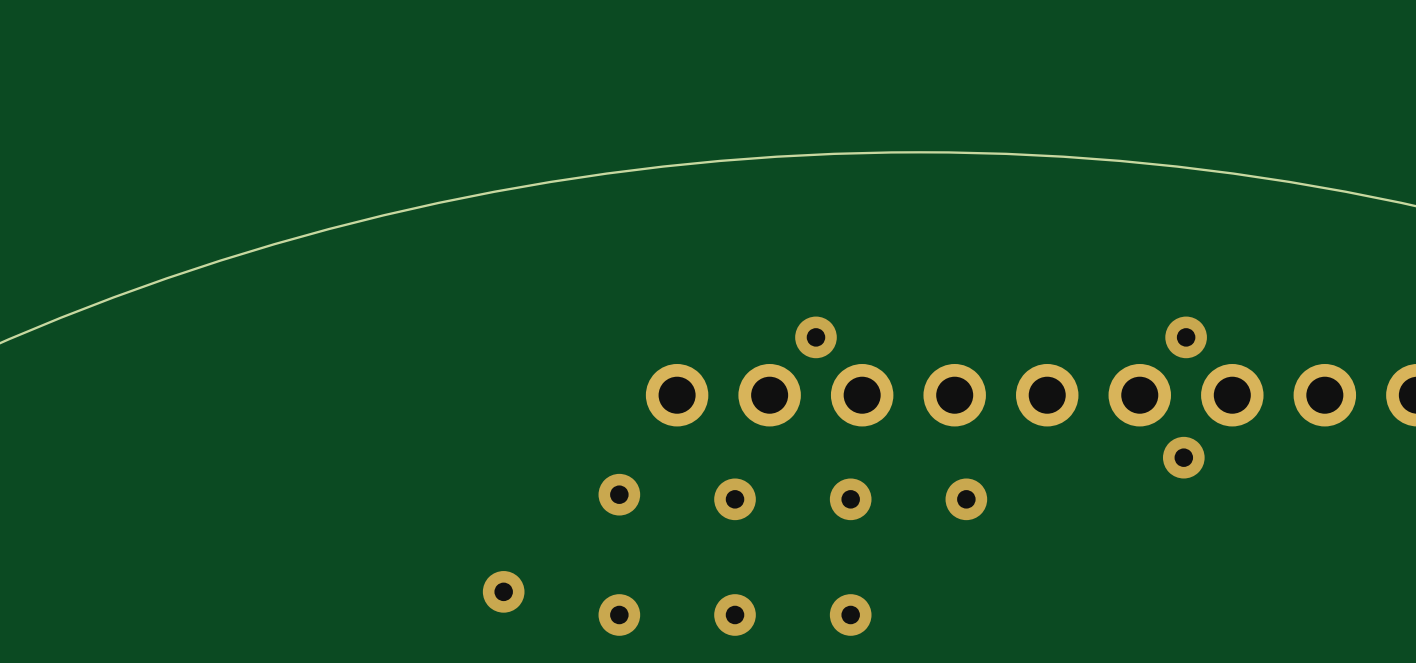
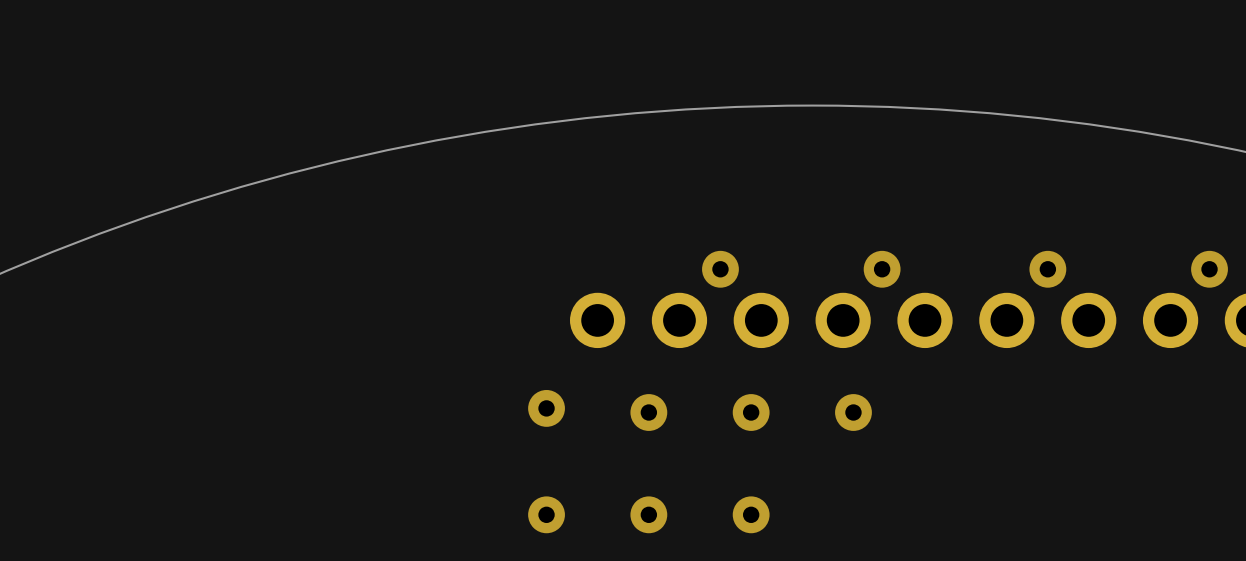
via: none -> (882, 269)
via: none -> (1209, 269)
via: (1183, 457) -> none
via: (503, 591) -> none

